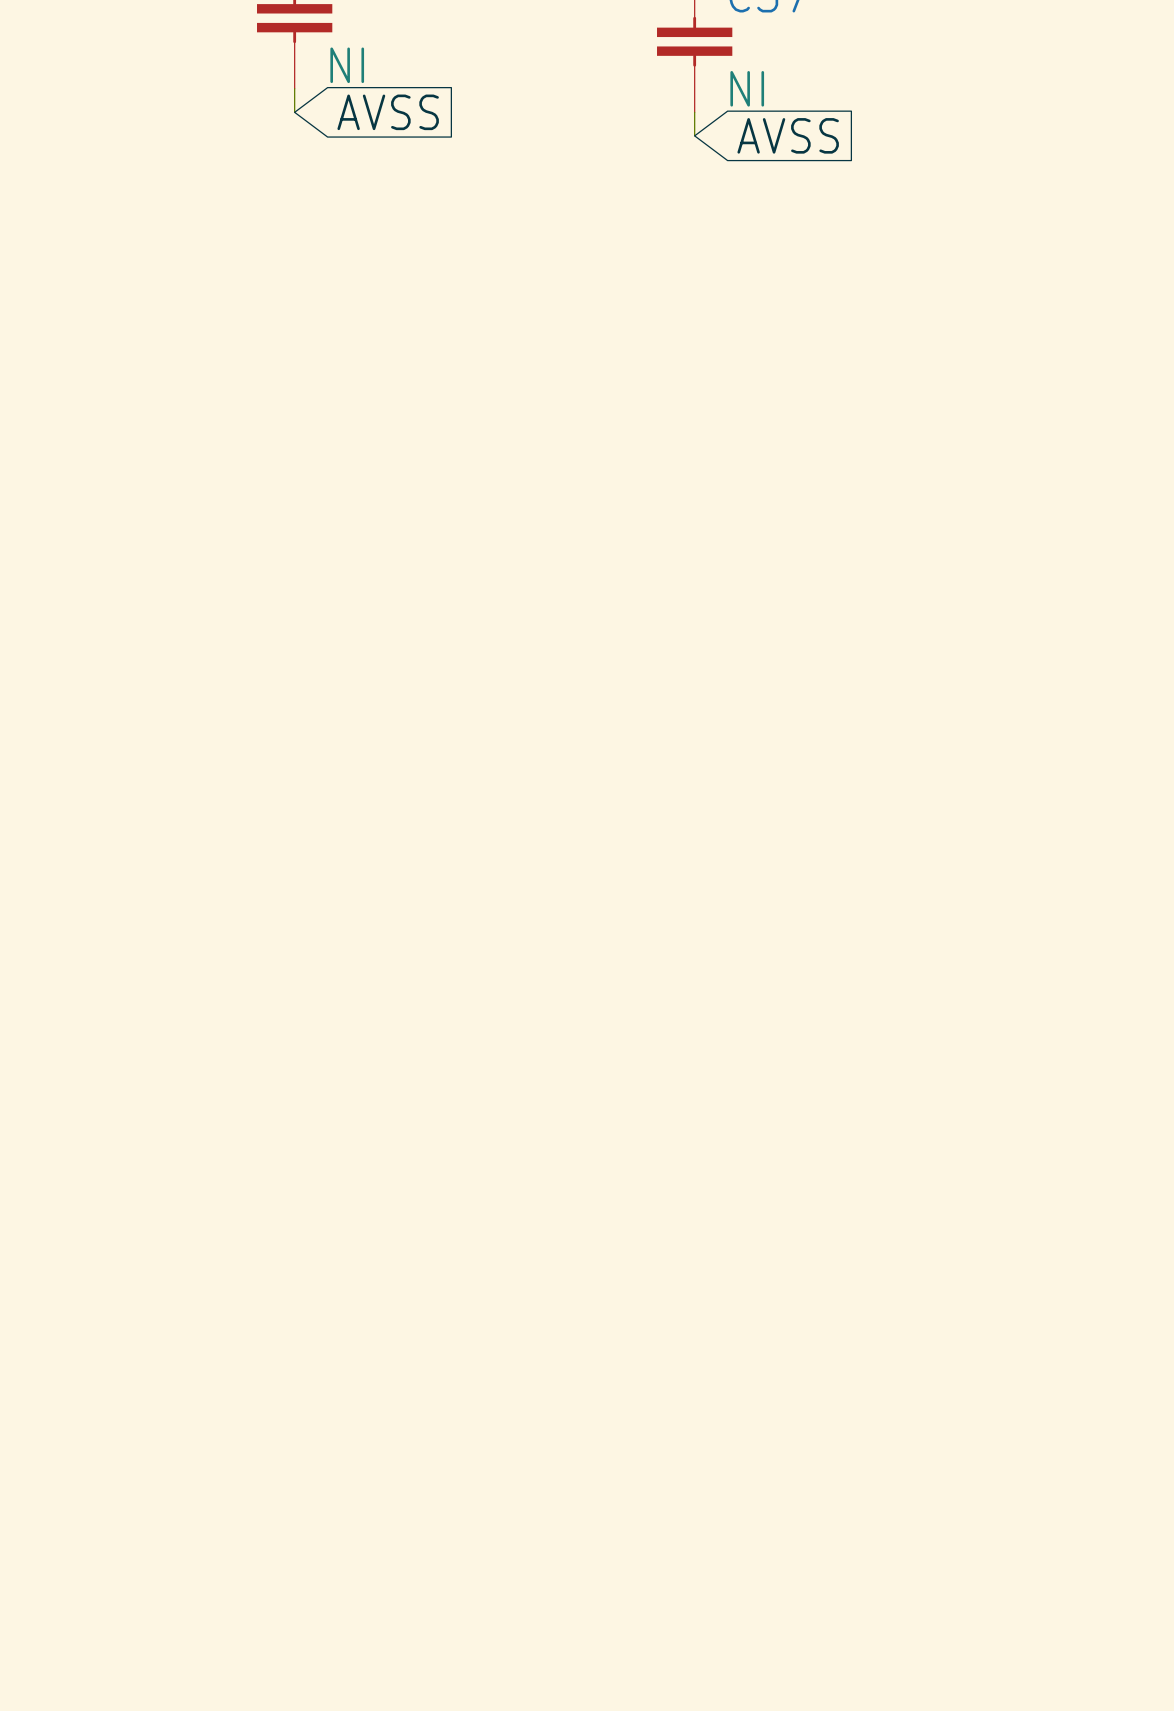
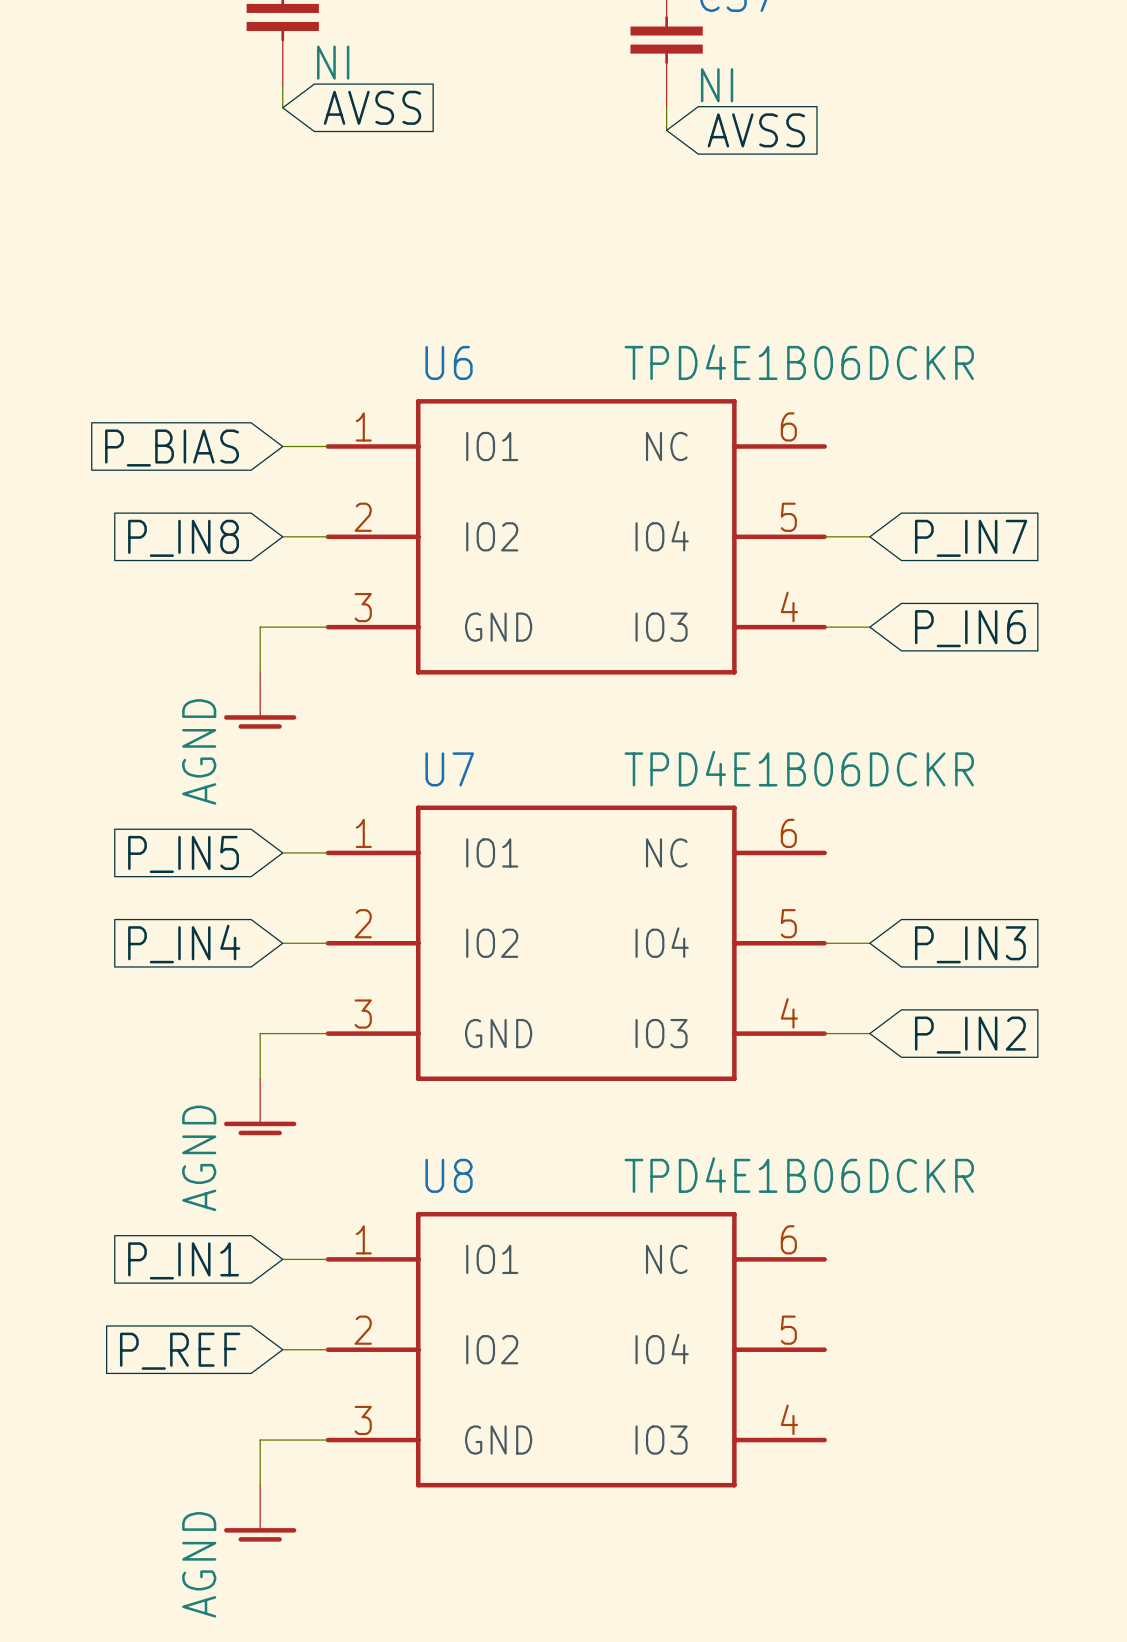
wire: none -> (282, 446) (327, 446)
global label: none -> P_BIAS (172, 448)
wire: none -> (282, 536) (327, 536)
U6: none -> TPD4E1B06DCKR (576, 536)
wire: none -> (824, 536) (869, 536)
global label: none -> P_IN8 (183, 538)
global label: none -> P_IN7 (971, 538)
wire: none -> (327, 627) (260, 627) (260, 672)
wire: none -> (824, 627) (869, 627)
global label: none -> P_IN6 (970, 628)
power symbol: none -> AGND (260, 700)
wire: none -> (282, 852) (327, 852)
global label: none -> P_IN5 (183, 854)
wire: none -> (282, 943) (327, 943)
U7: none -> TPD4E1B06DCKR (576, 943)
wire: none -> (824, 943) (869, 943)
global label: none -> P_IN4 (184, 944)
global label: none -> P_IN3 (970, 944)
wire: none -> (327, 1033) (260, 1033) (260, 1078)
wire: none -> (824, 1033) (869, 1033)
global label: none -> P_IN2 (970, 1035)
power symbol: none -> AGND (260, 1106)
wire: none -> (282, 1259) (327, 1259)
global label: none -> P_IN1 (183, 1260)
wire: none -> (282, 1349) (327, 1349)
U8: none -> TPD4E1B06DCKR (576, 1349)
global label: none -> P_REF (180, 1351)
wire: none -> (327, 1440) (260, 1440) (260, 1485)
power symbol: none -> AGND (260, 1513)

